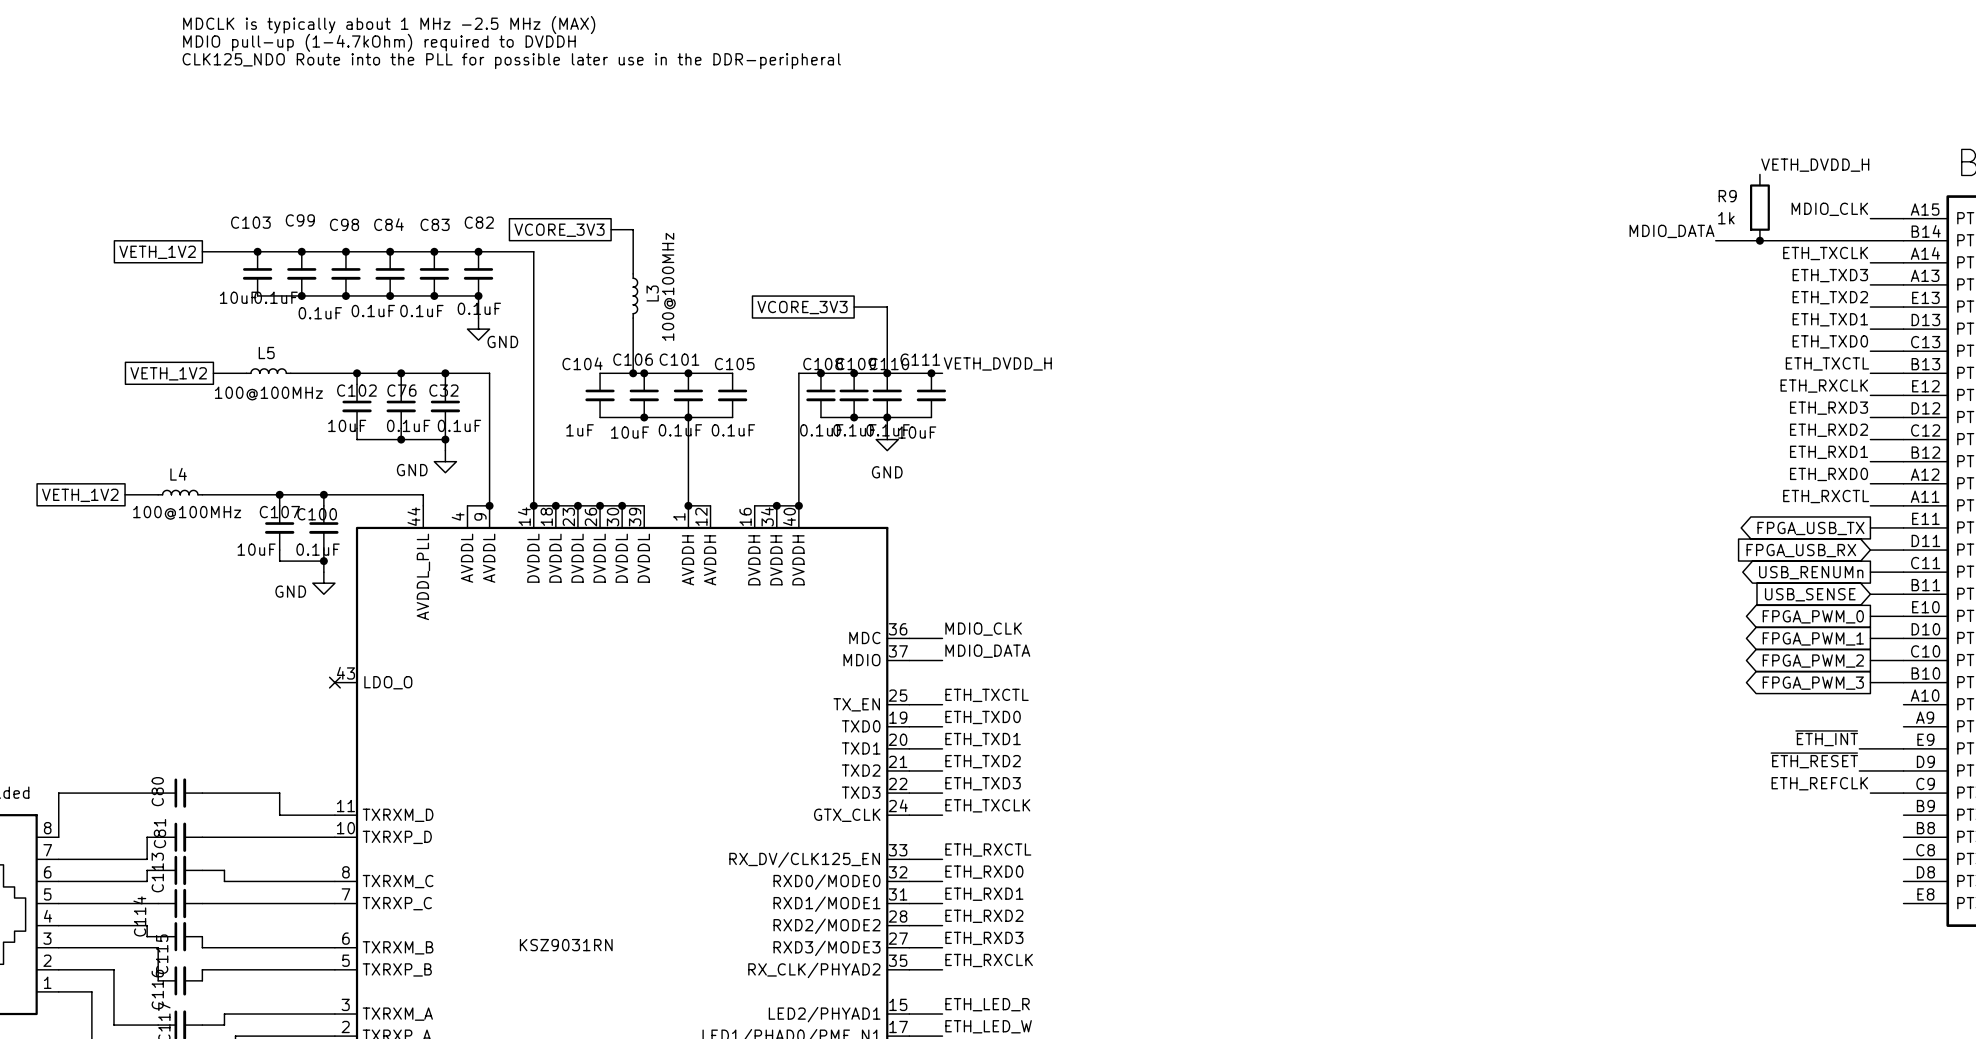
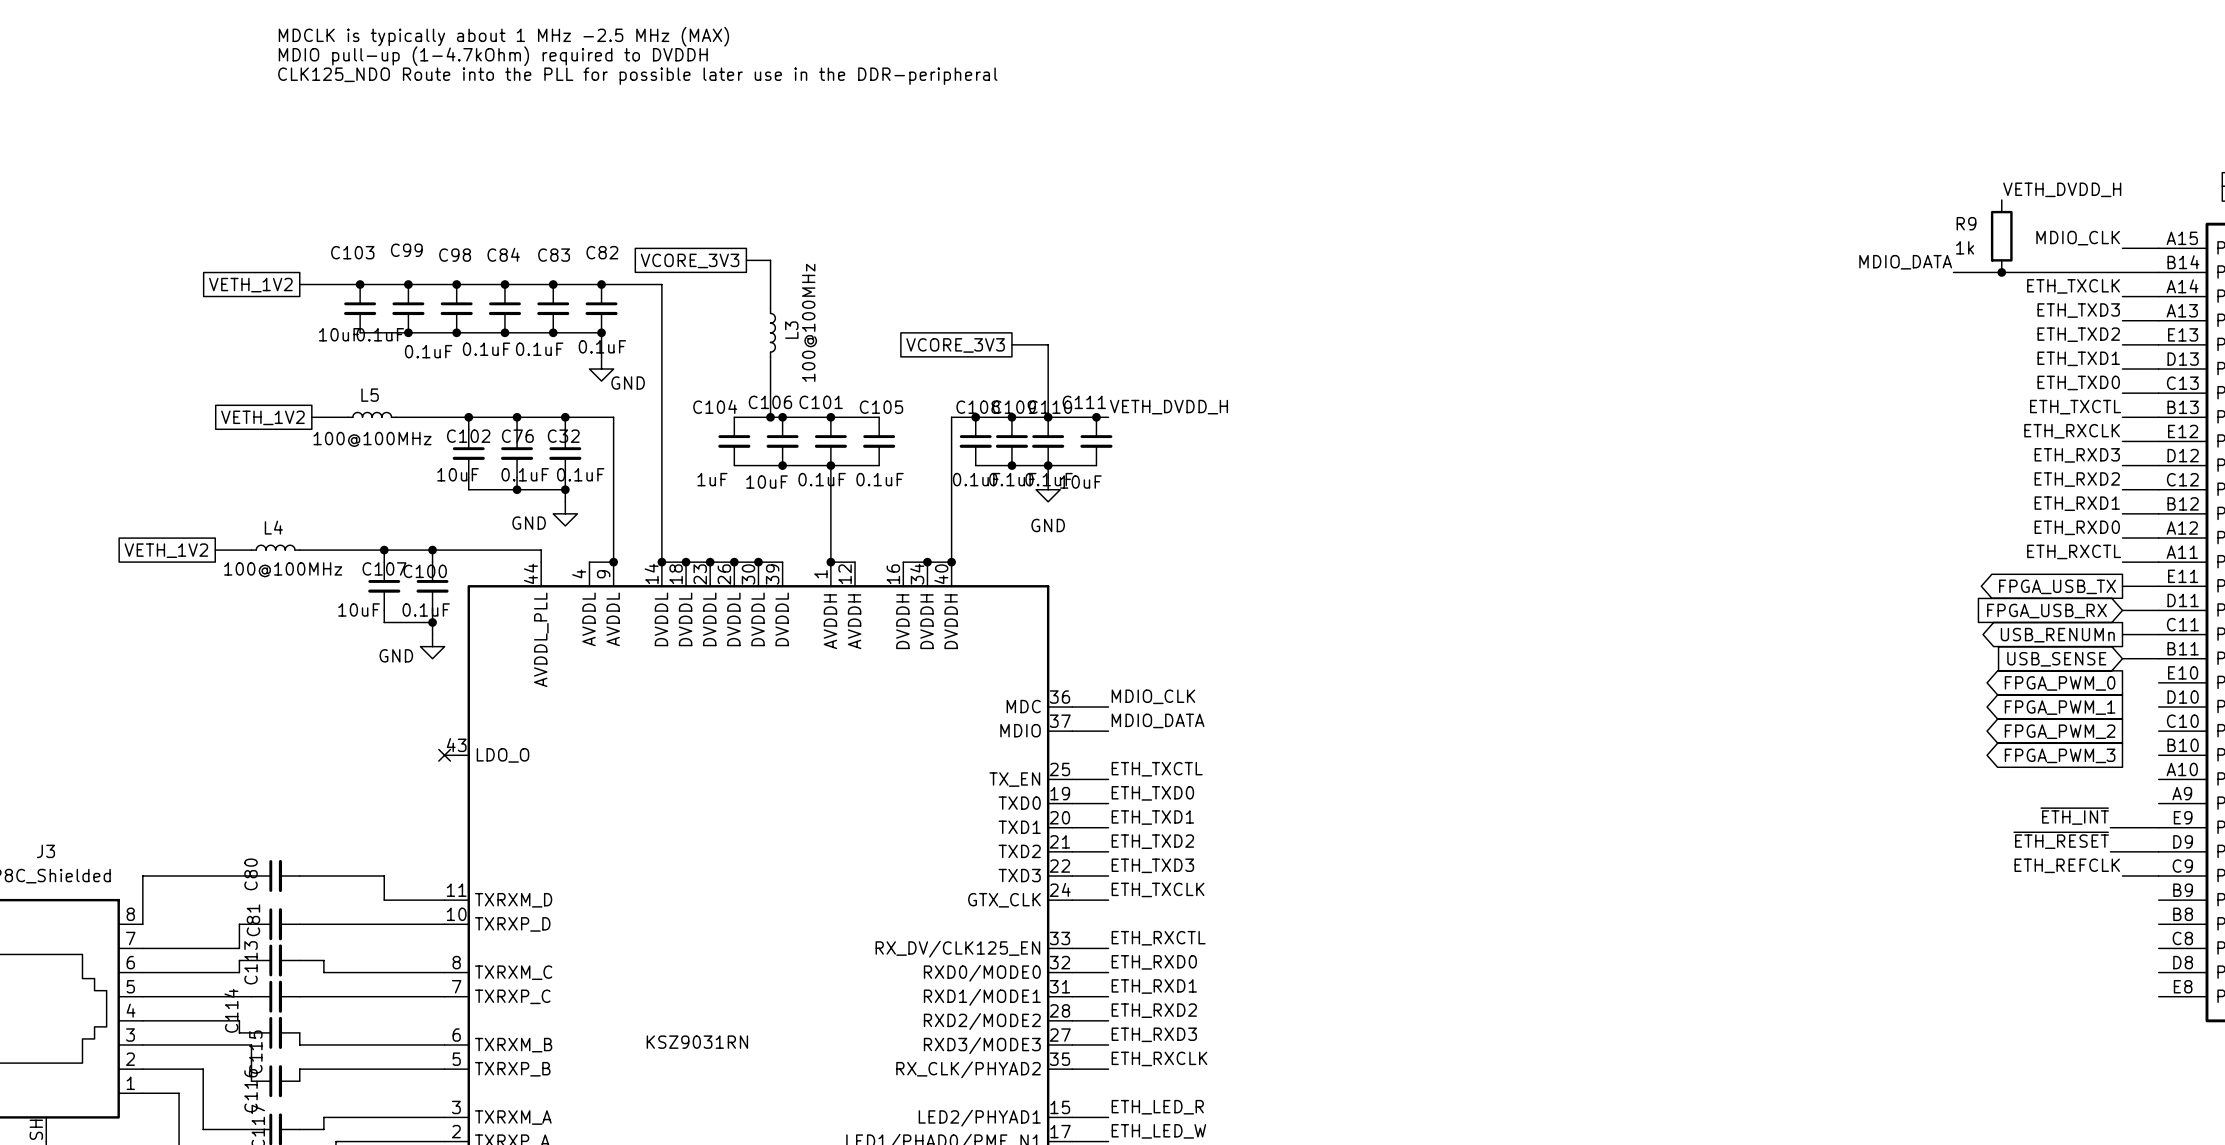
wire: (1870, 616) (1903, 616) -> none
wire: (1870, 638) (1903, 638) -> none
wire: (1870, 660) (1903, 660) -> none
wire: (1870, 682) (1903, 682) -> none

